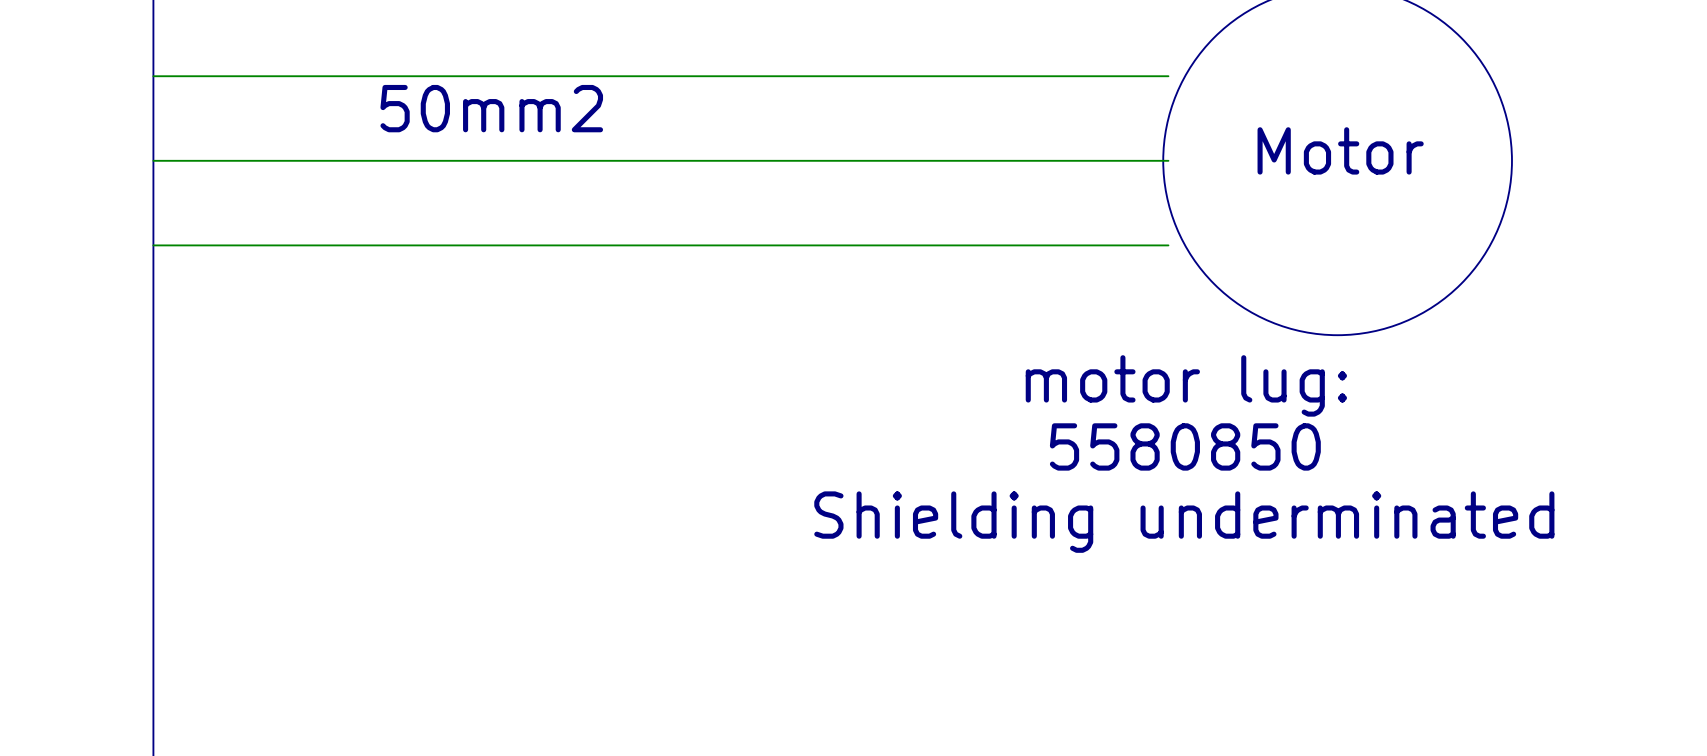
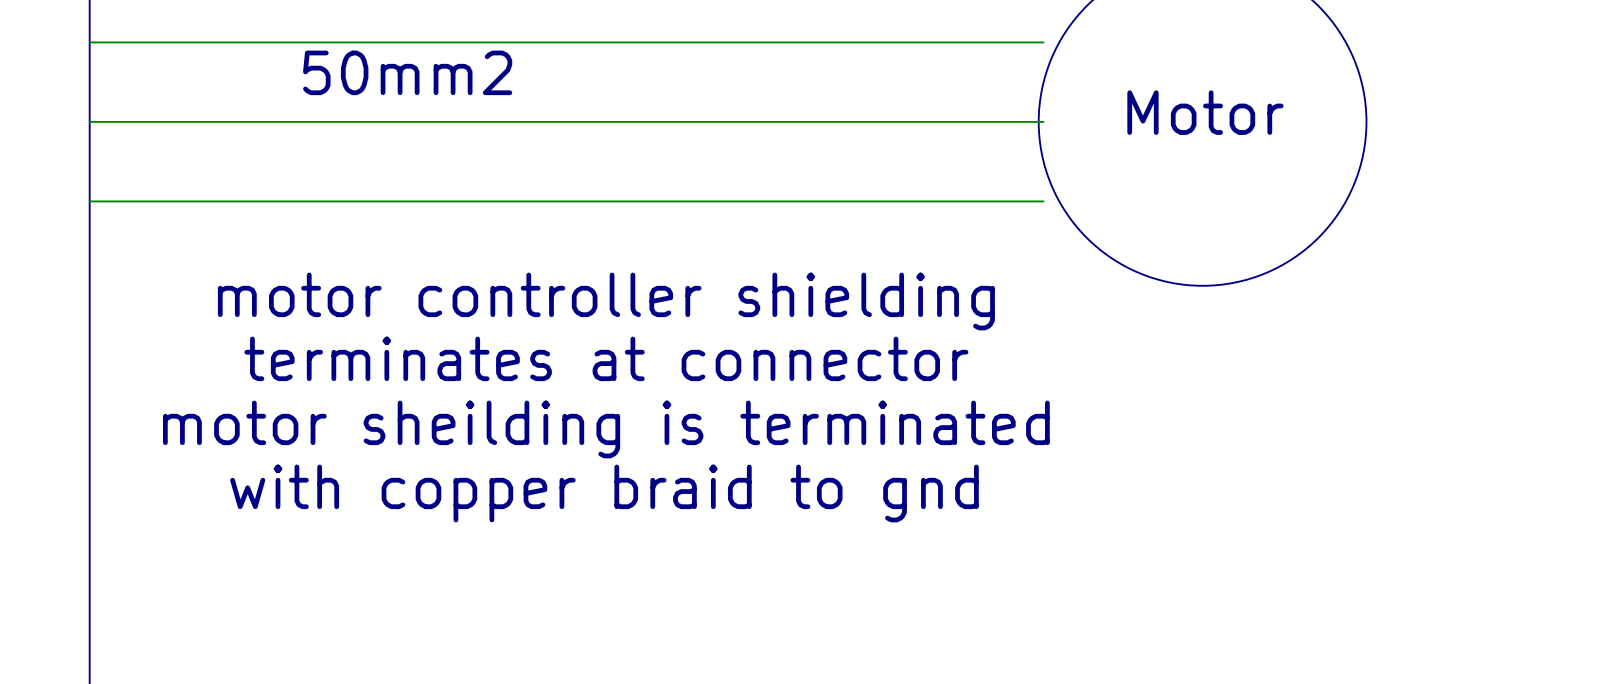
text: none -> motor controller shielding (606, 301)
text: motor lug: (1186, 385) -> none
text: none -> terminates at connector (606, 358)
text: 5580850 (1185, 446) -> none
text: Shielding underminated (1184, 522) -> motor sheilding is terminated (606, 429)
text: none -> with copper braid to gnd (604, 493)

